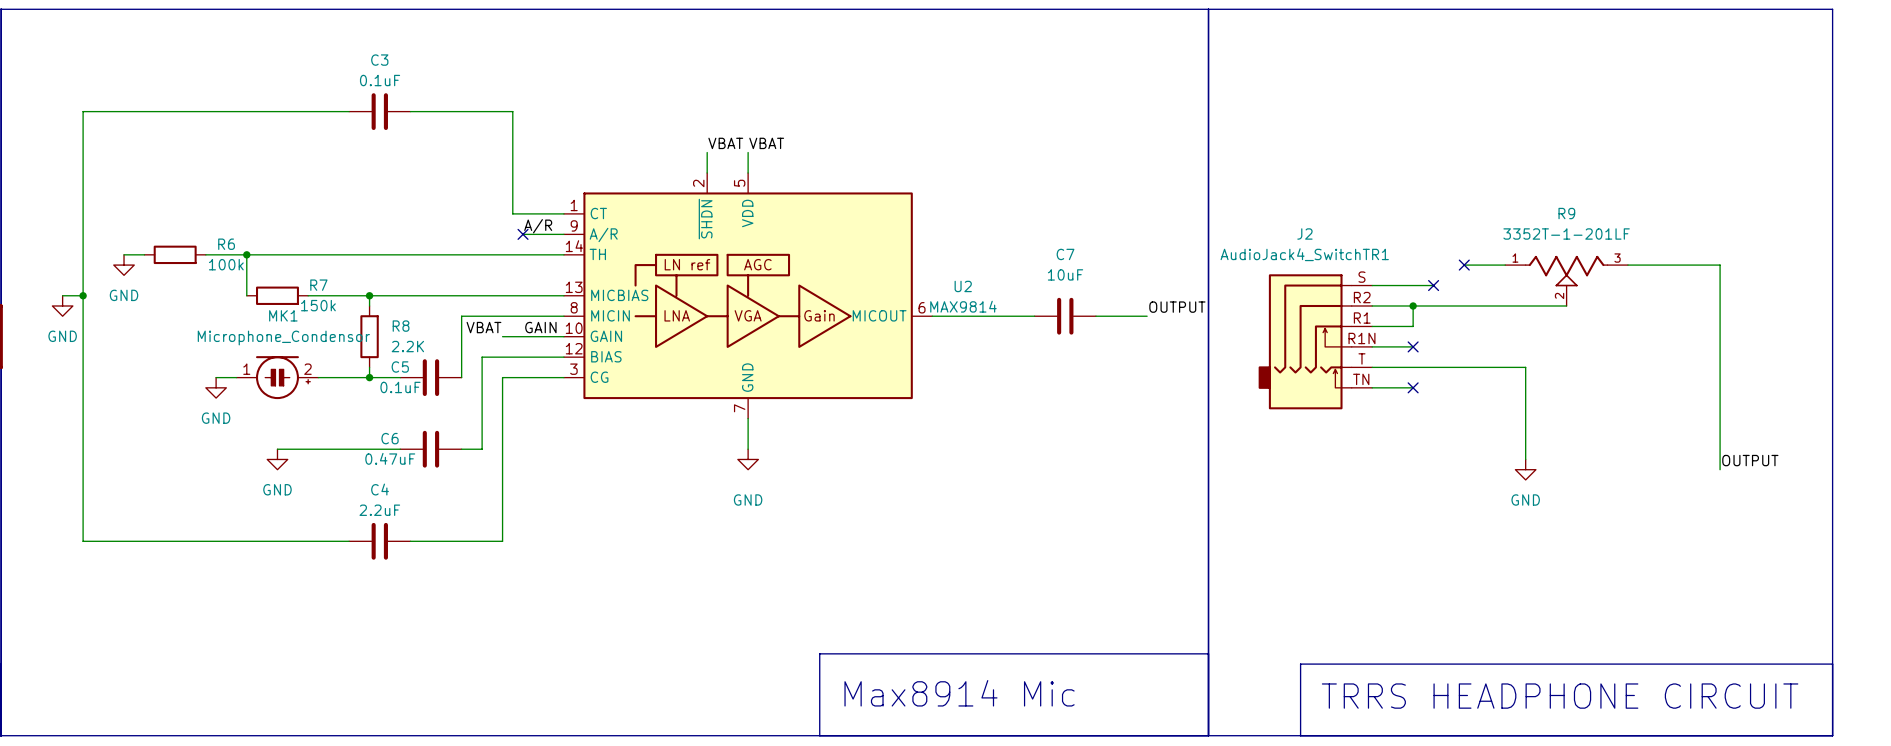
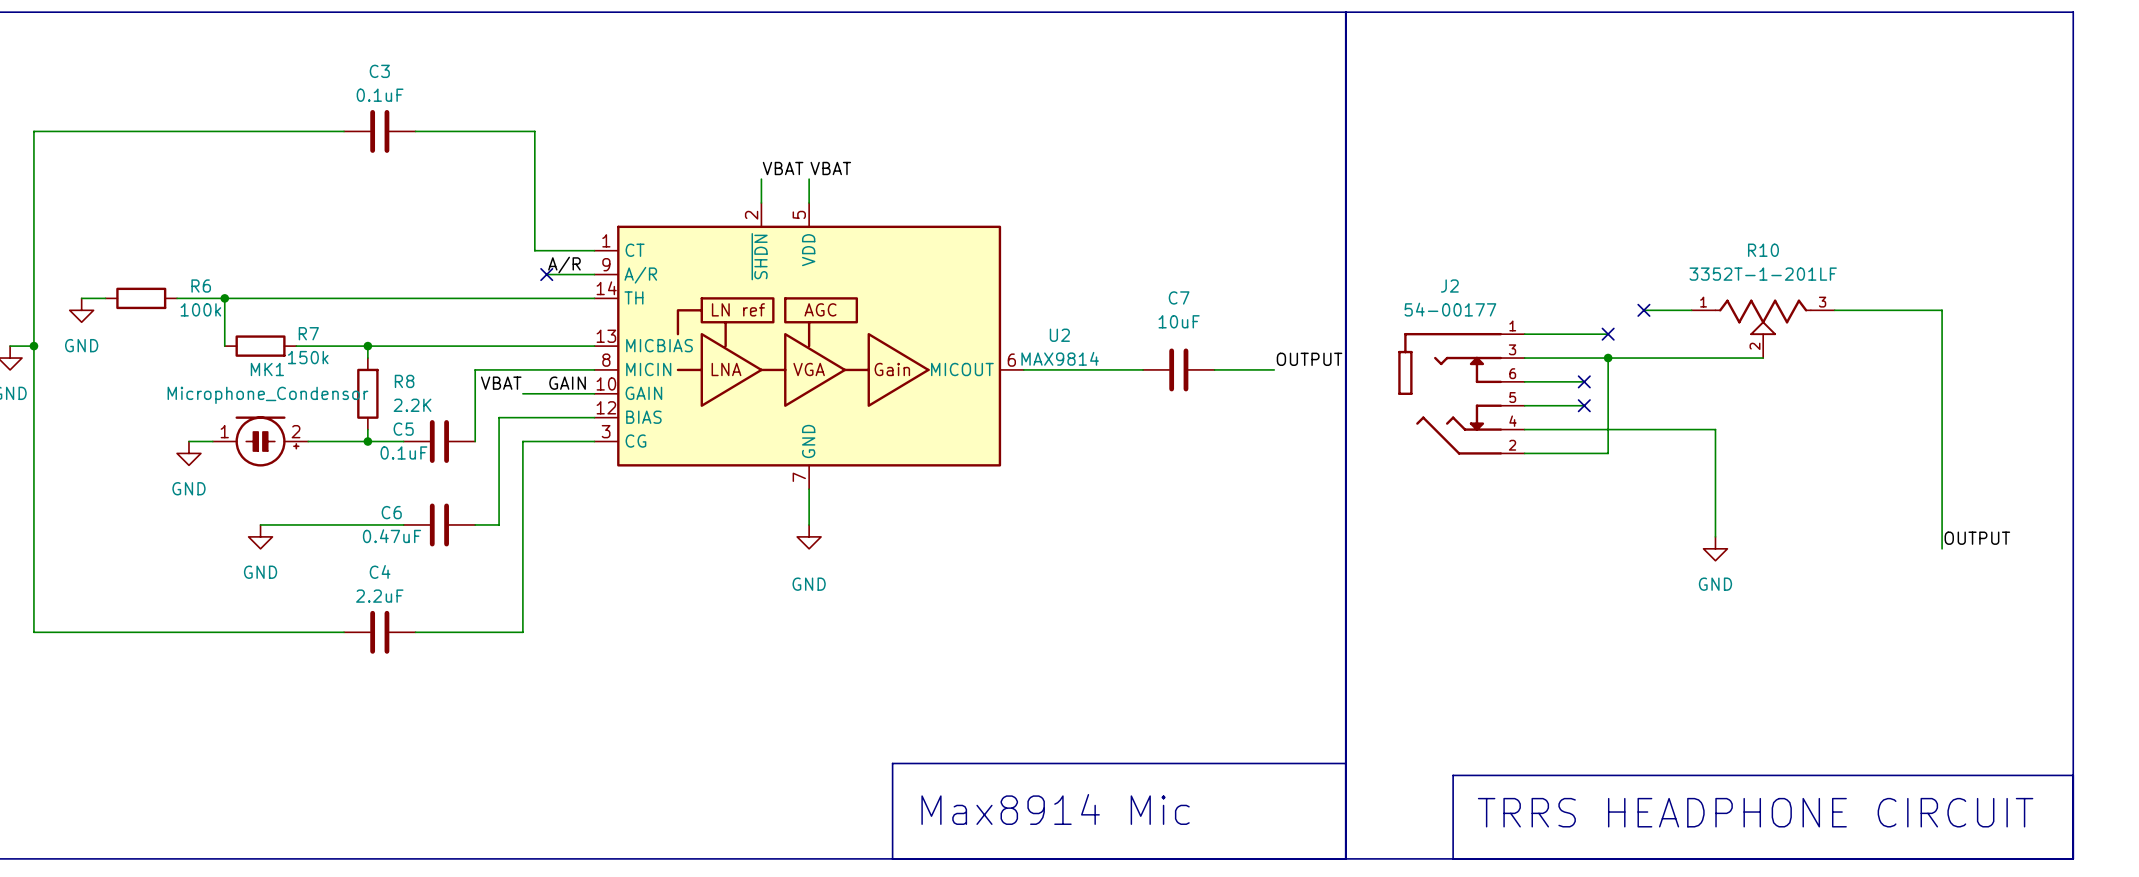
R9 name: R9 (1566, 213) -> R10 (1763, 250)
J2 value: AudioJack4_SwitchTR1 (1304, 254) -> 54-00177 (1450, 309)
J2 symbol: [1258, 274, 1373, 410] -> [1398, 332, 1525, 455]
wire: (1413, 305) (1413, 326) -> none
junction position: (1413, 305) -> (1608, 358)
wire: none -> (1608, 358) (1608, 453) (1584, 453)
no-connect mark: none -> (1584, 381)
no-connect mark: (1413, 387) -> none

